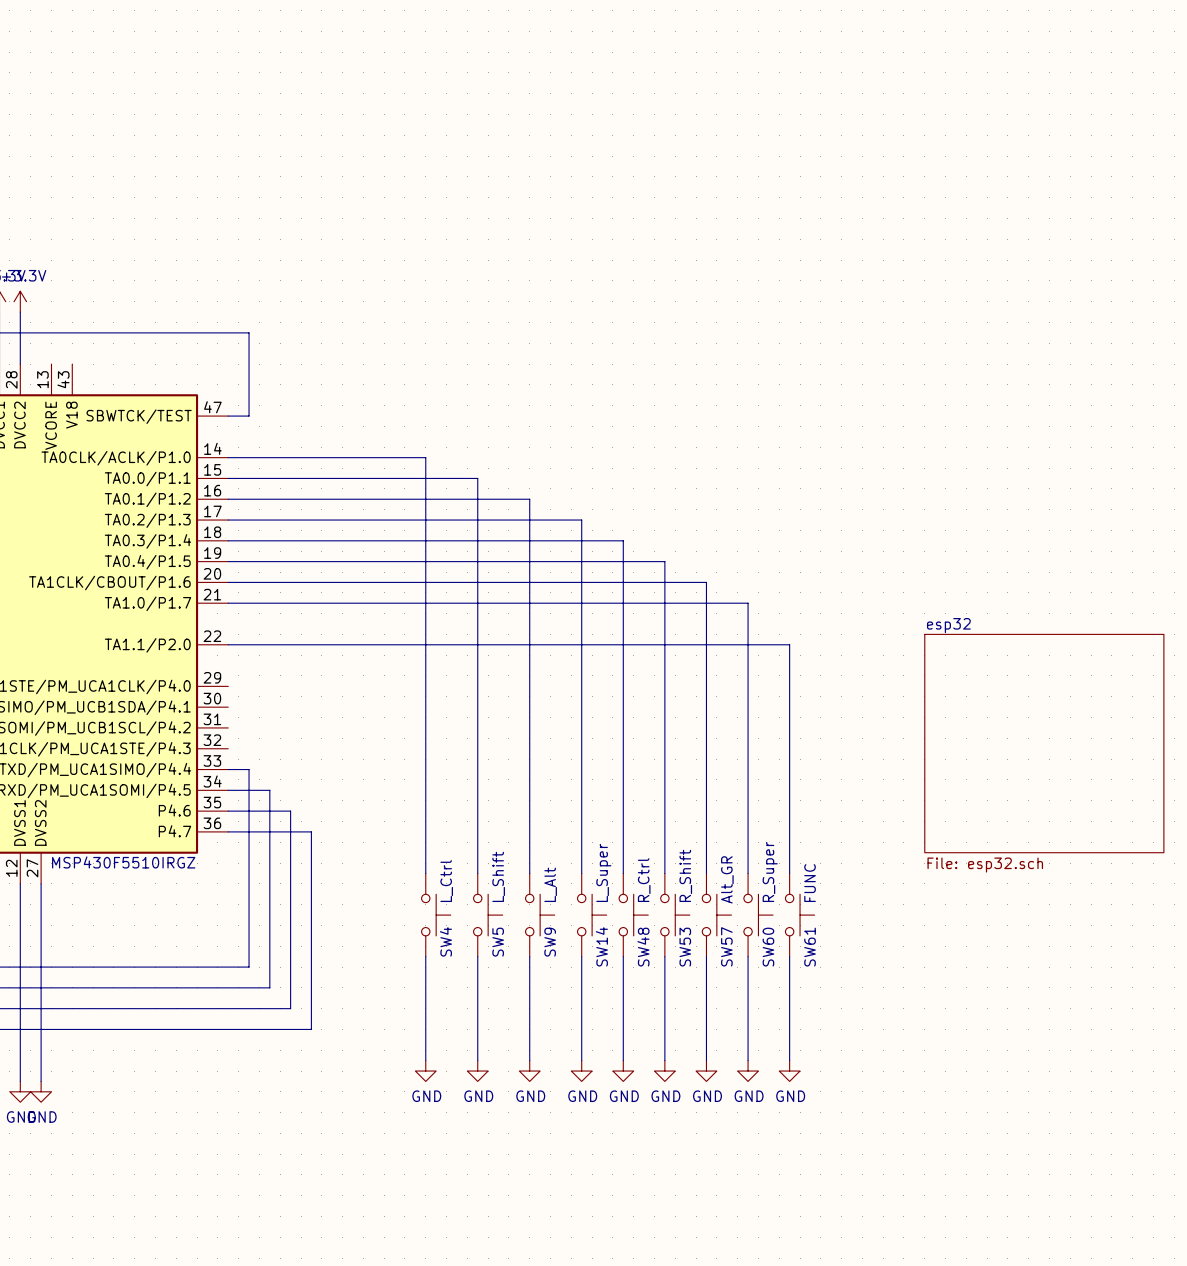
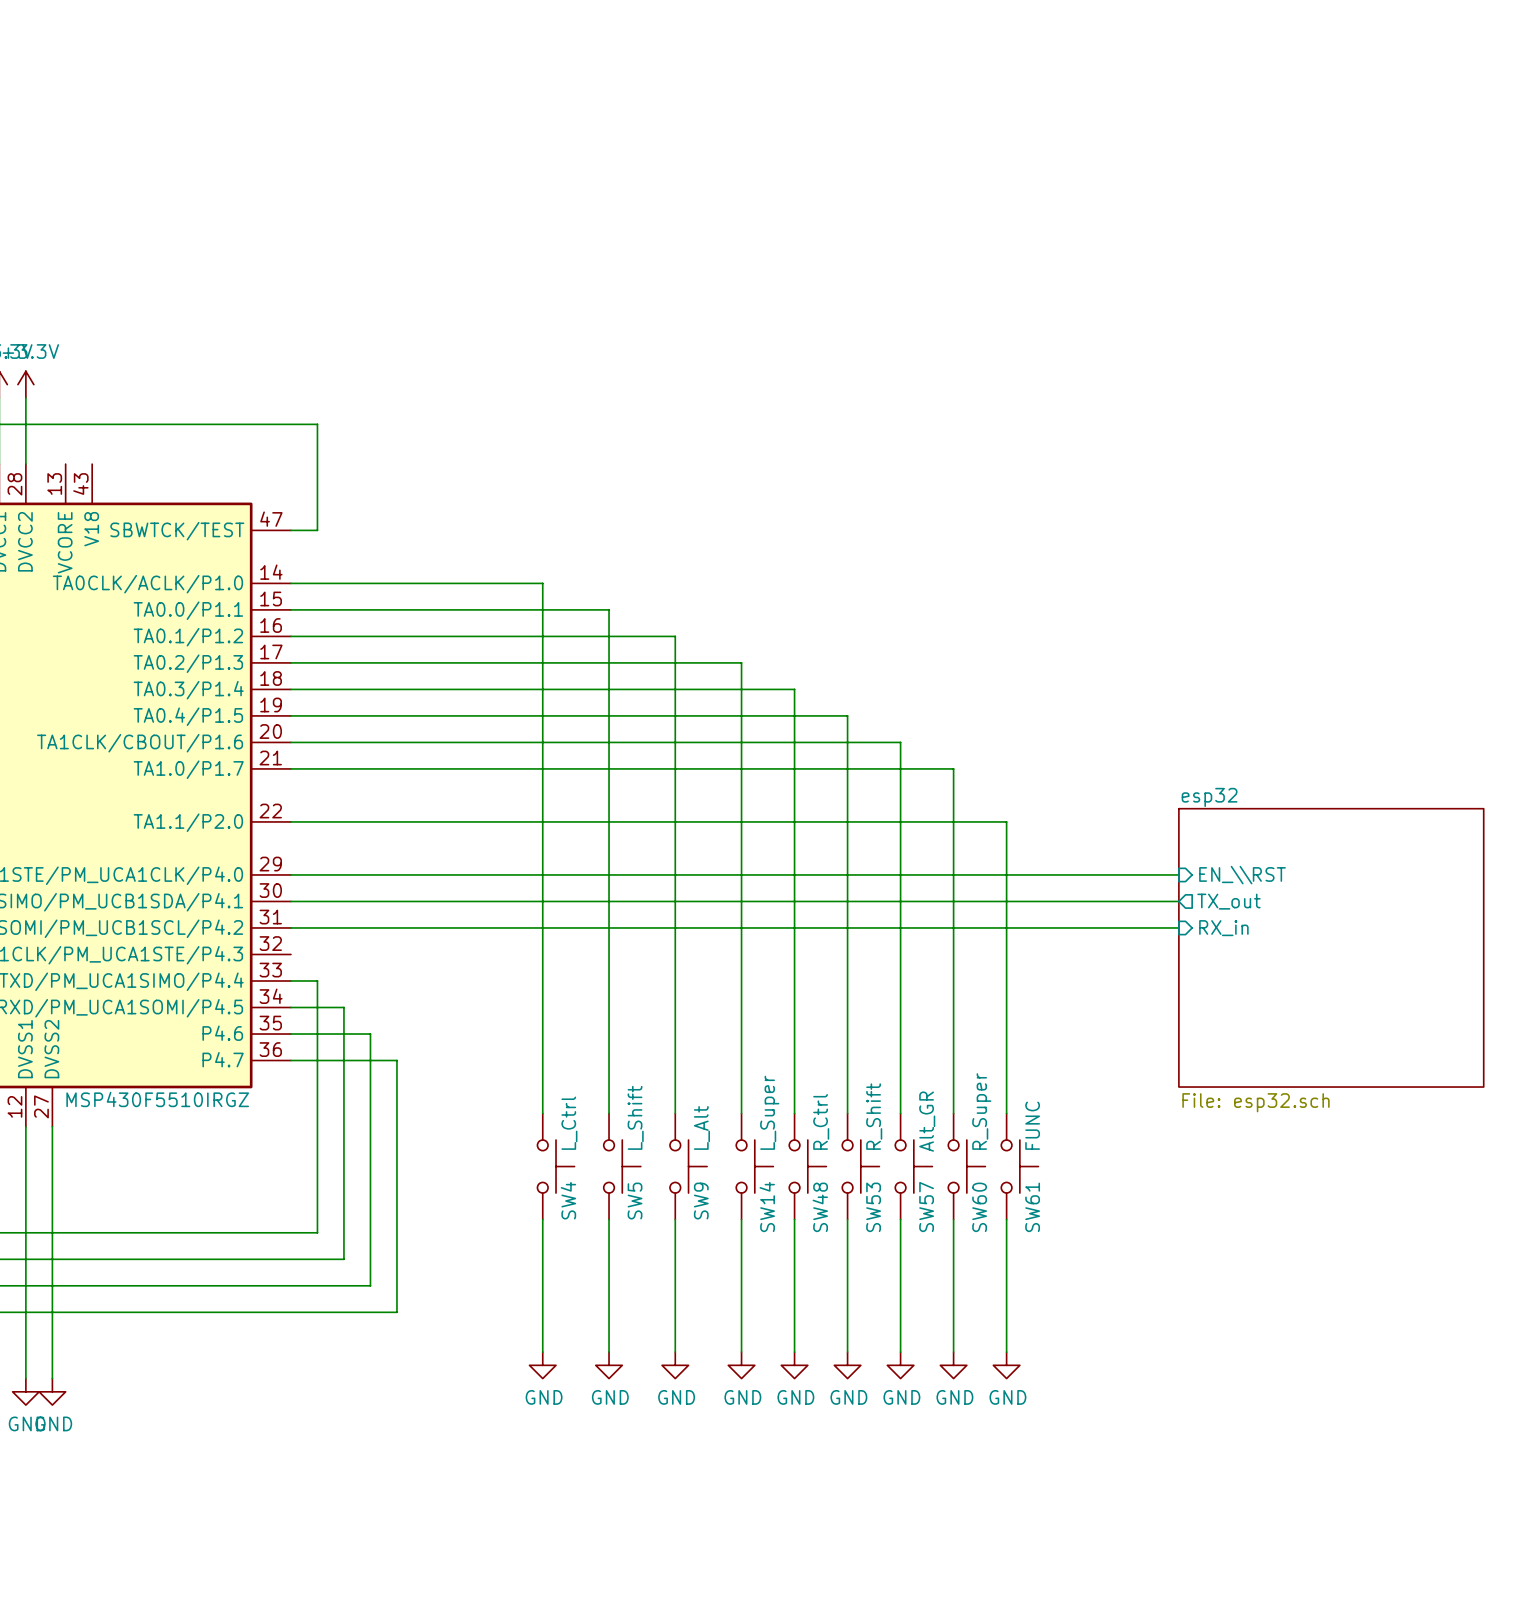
wire: none -> (290, 874) (1178, 874)
sheet pin: none -> EN_\\RST (1242, 875)
wire: none -> (290, 901) (1178, 901)
sheet pin: none -> TX_out (1228, 901)
wire: none -> (290, 927) (1178, 927)
sheet pin: none -> RX_in (1223, 928)

